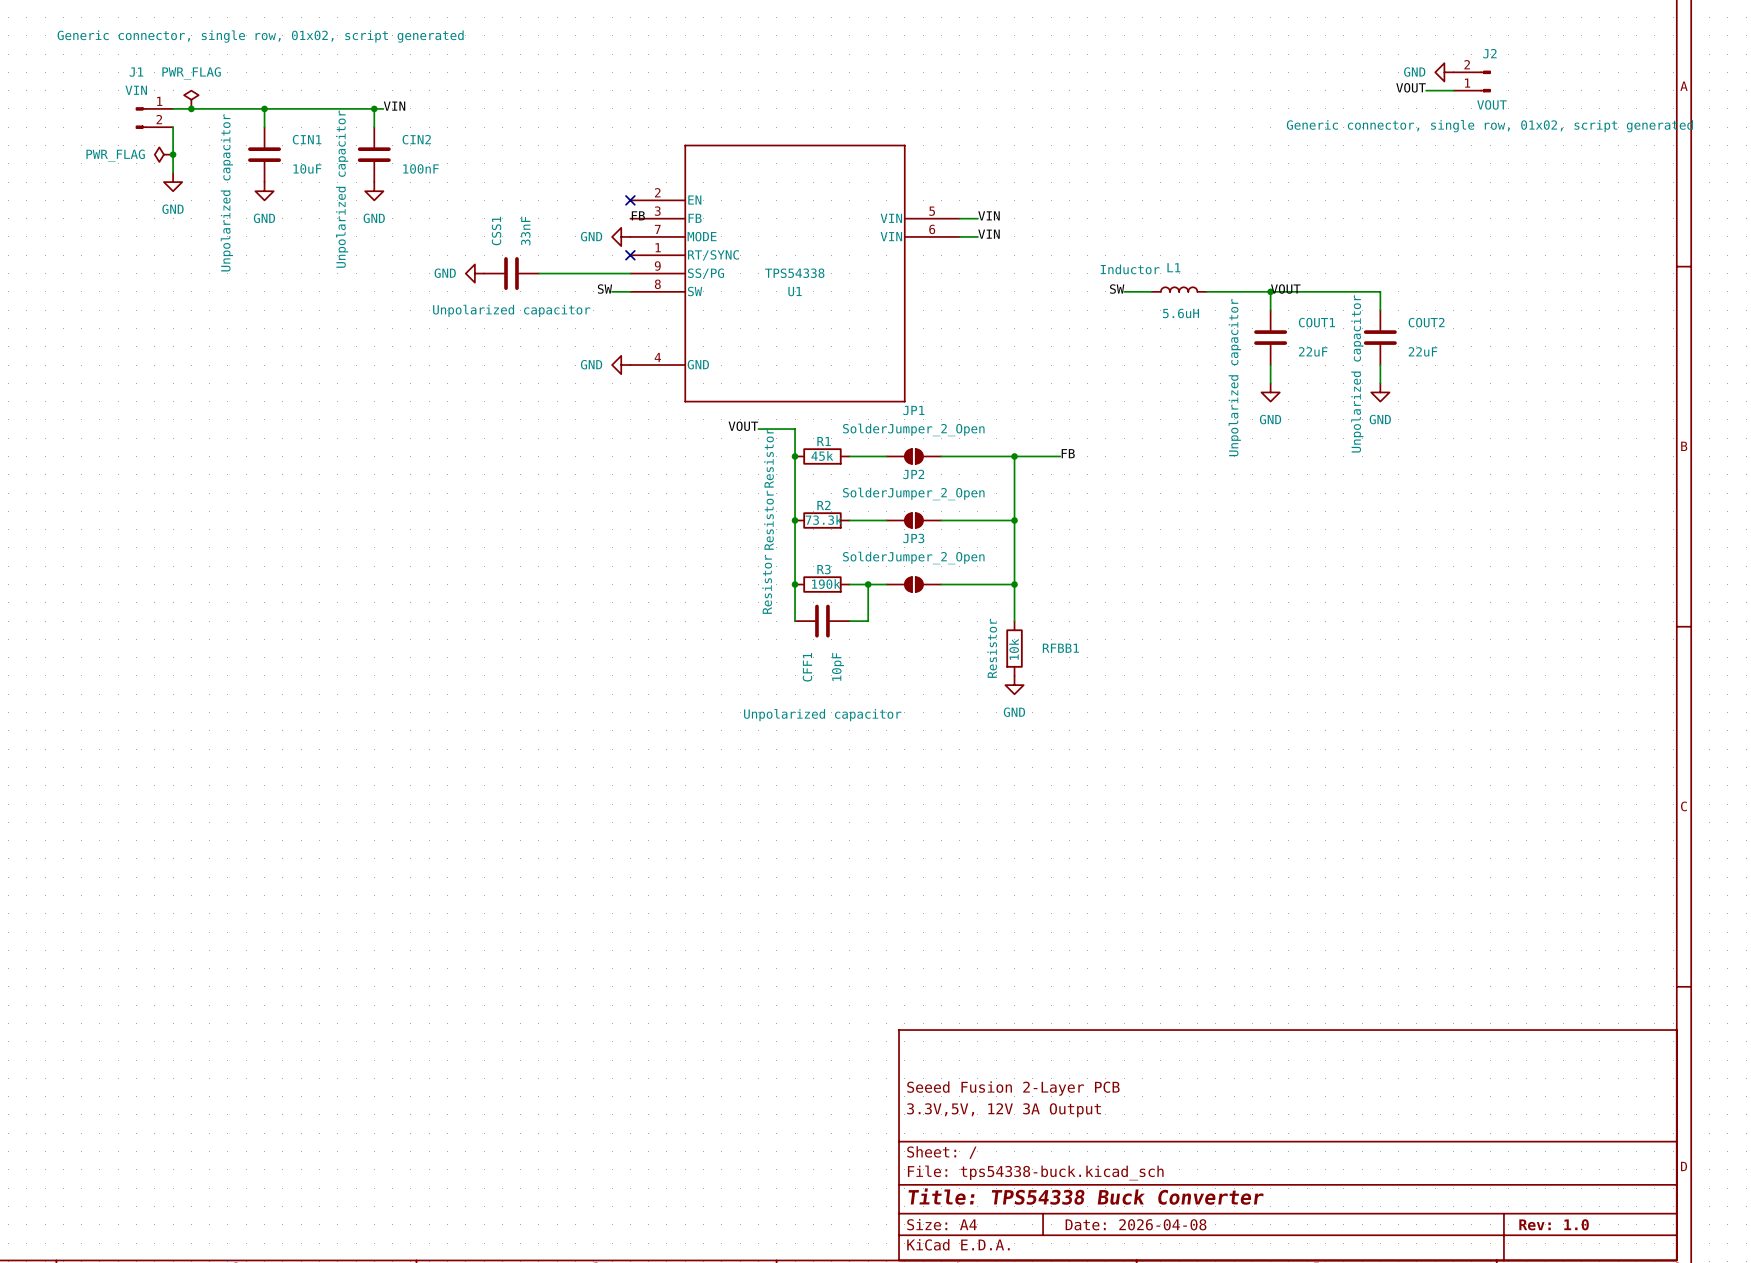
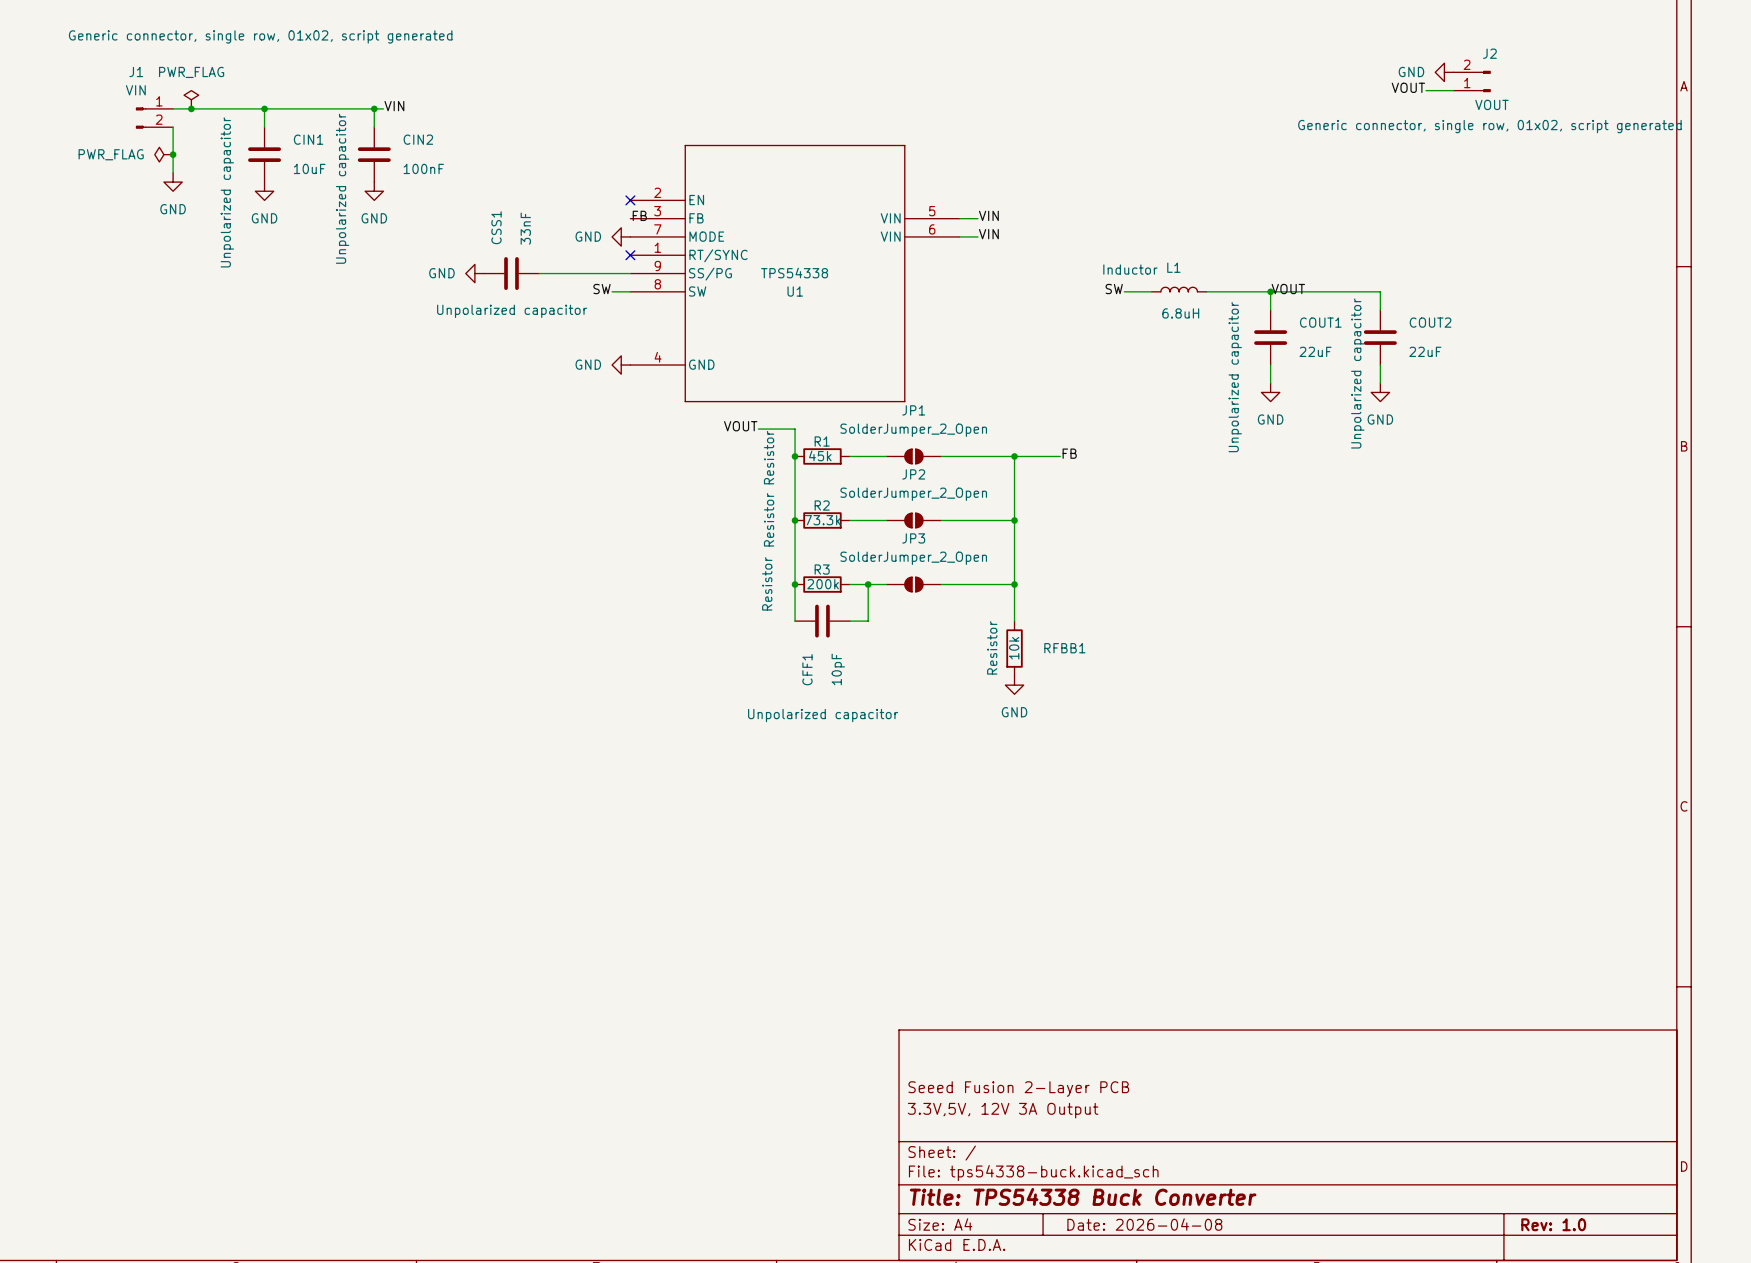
L1 value: 5.6uH (1181, 313) -> 6.8uH (1180, 313)
R3 value: 190k (826, 584) -> 200k (823, 584)

